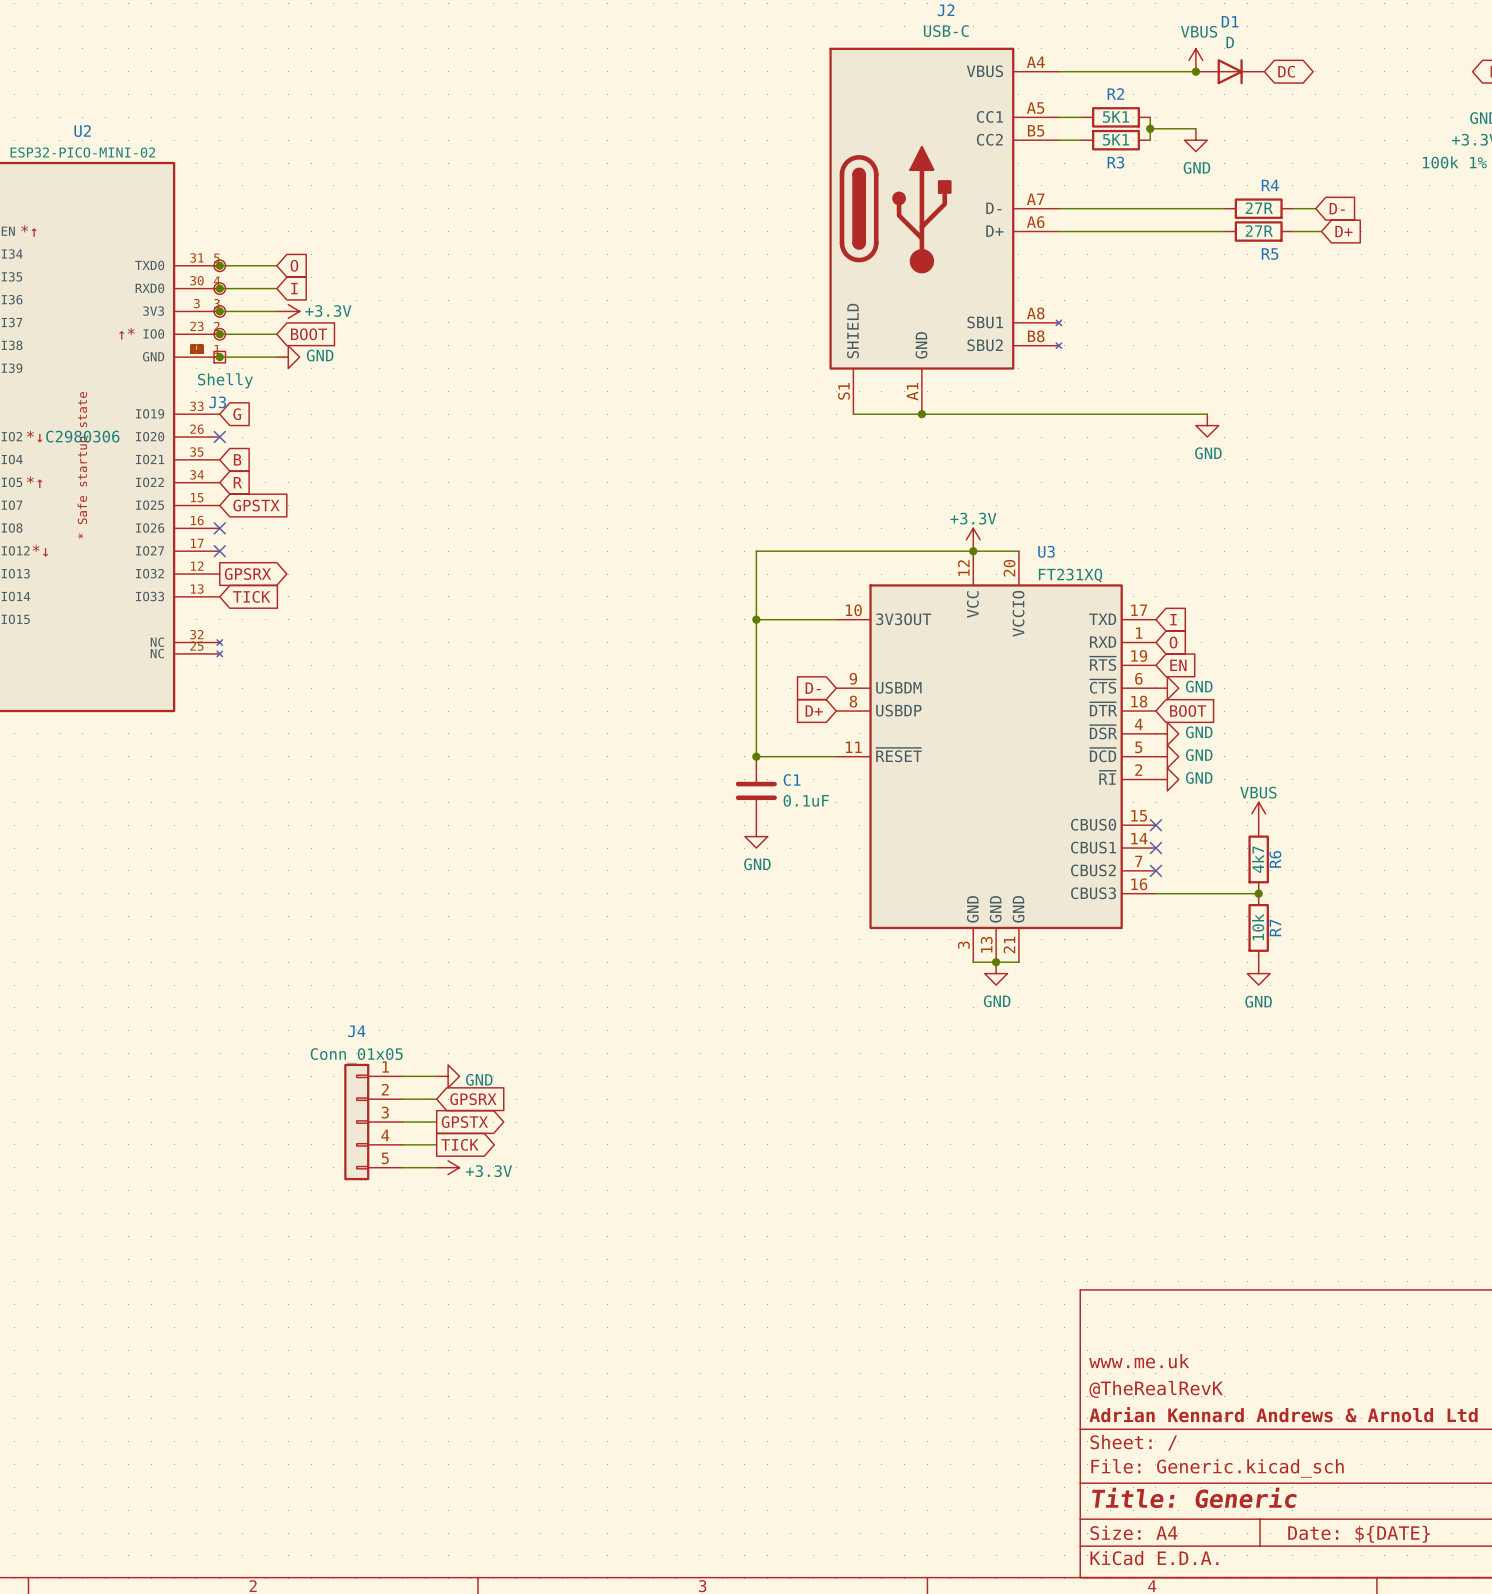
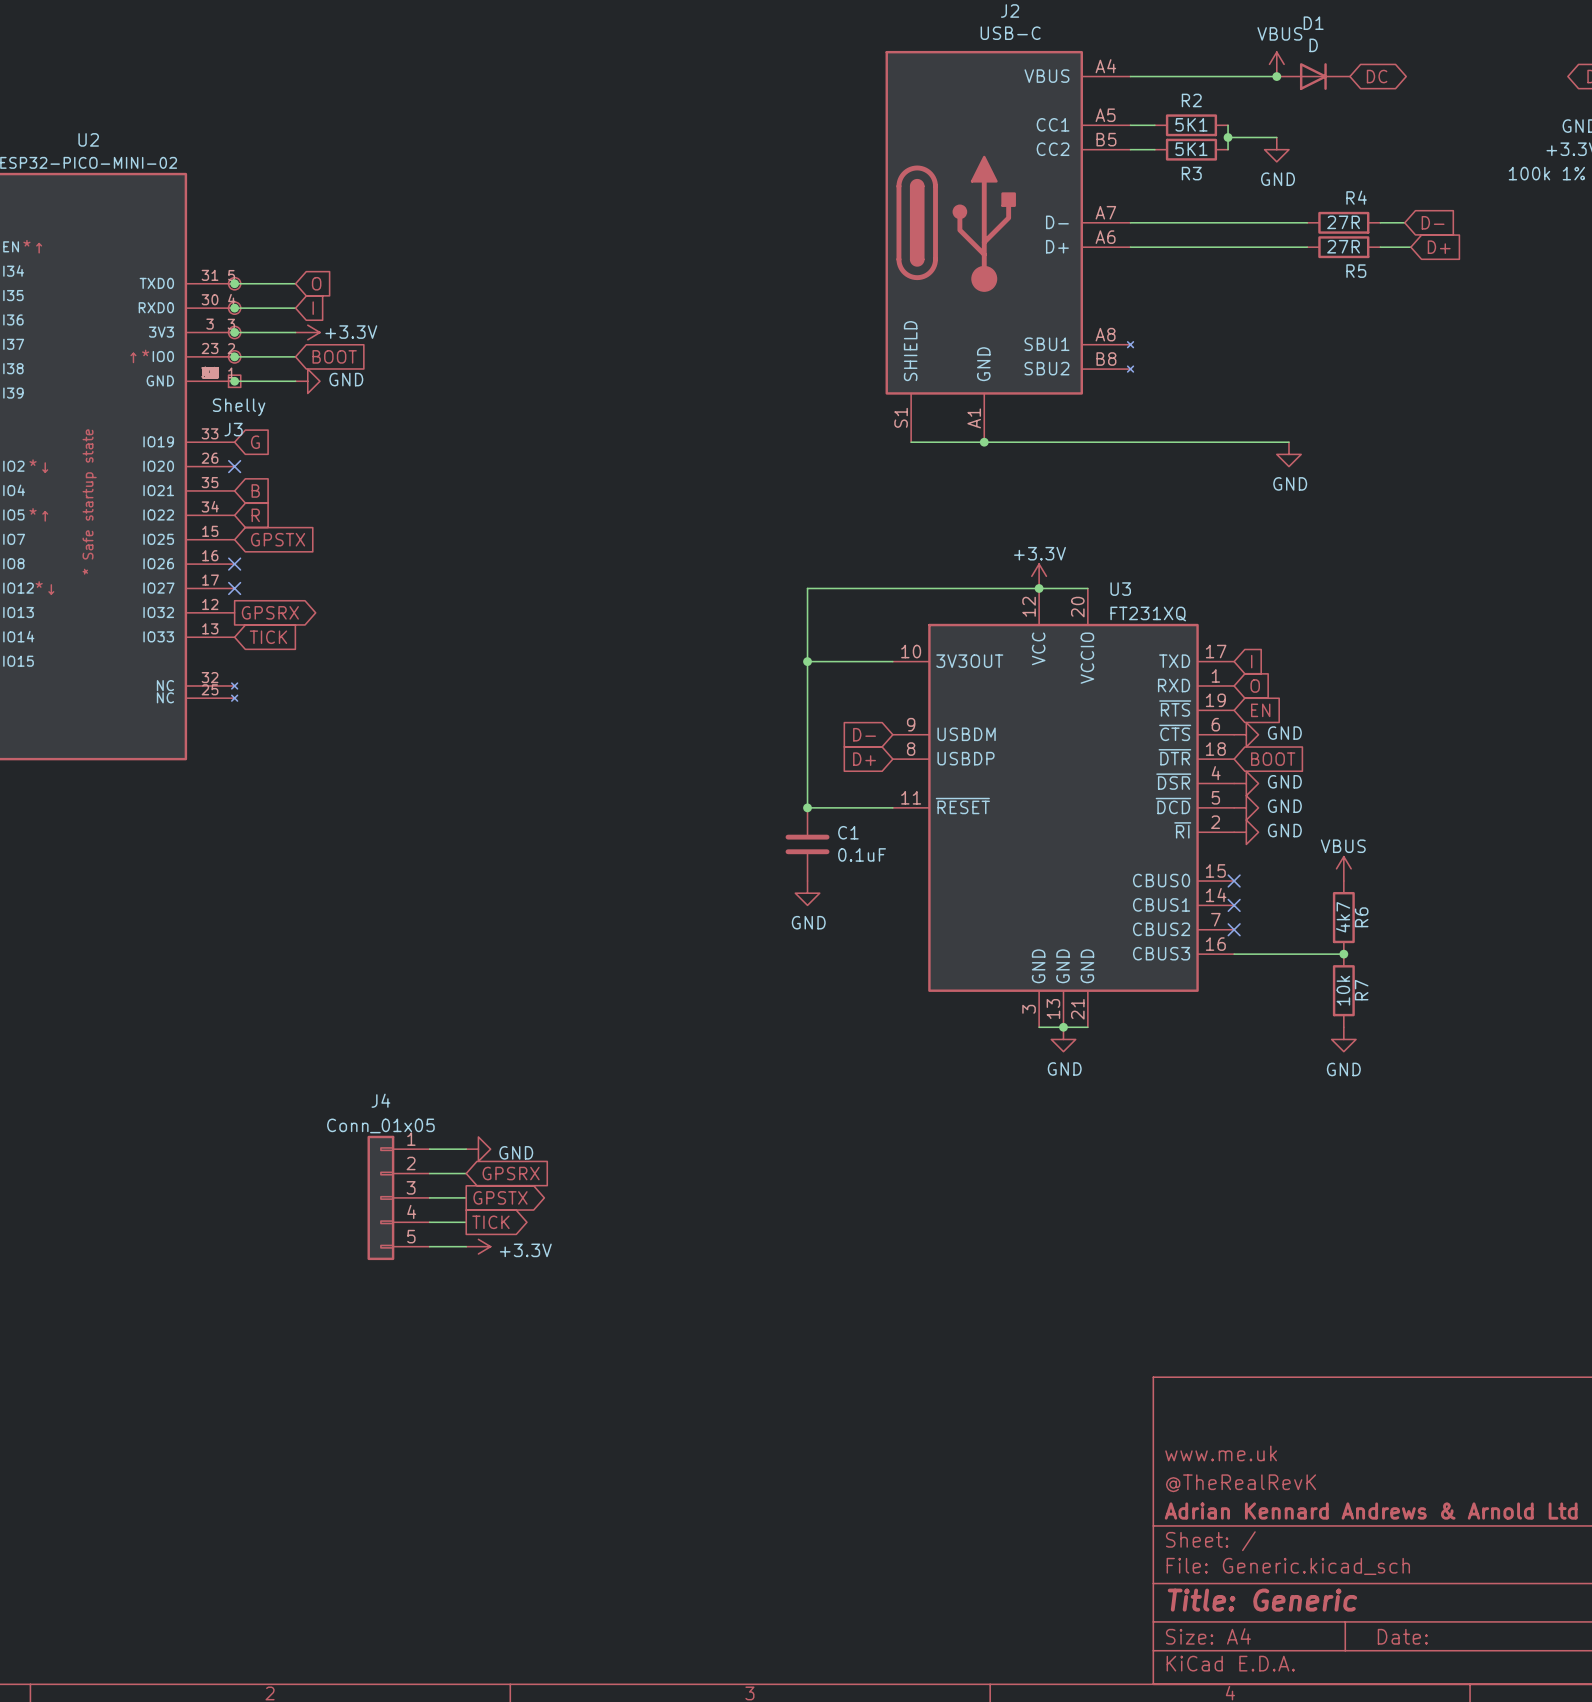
U2 text: C2980306 (82, 436) -> none
title block: Date: ${DATE} (1359, 1534) -> Date: (1402, 1636)

